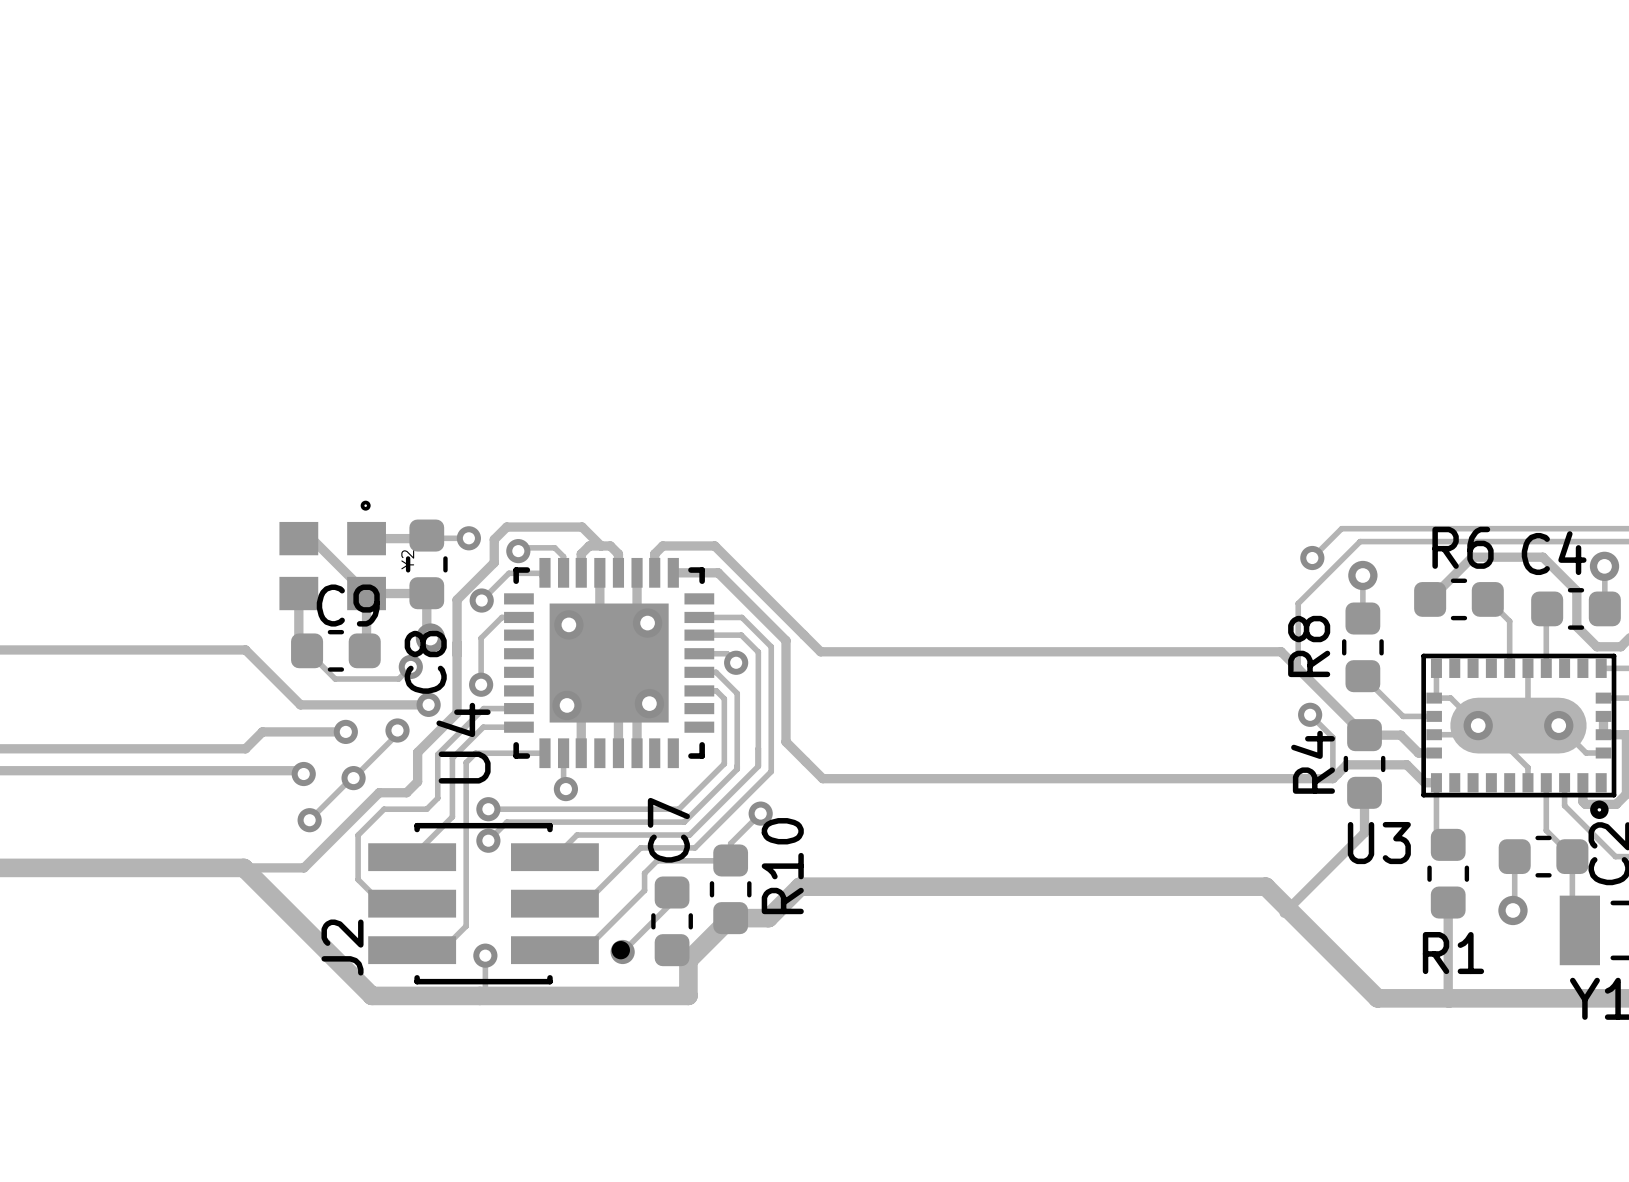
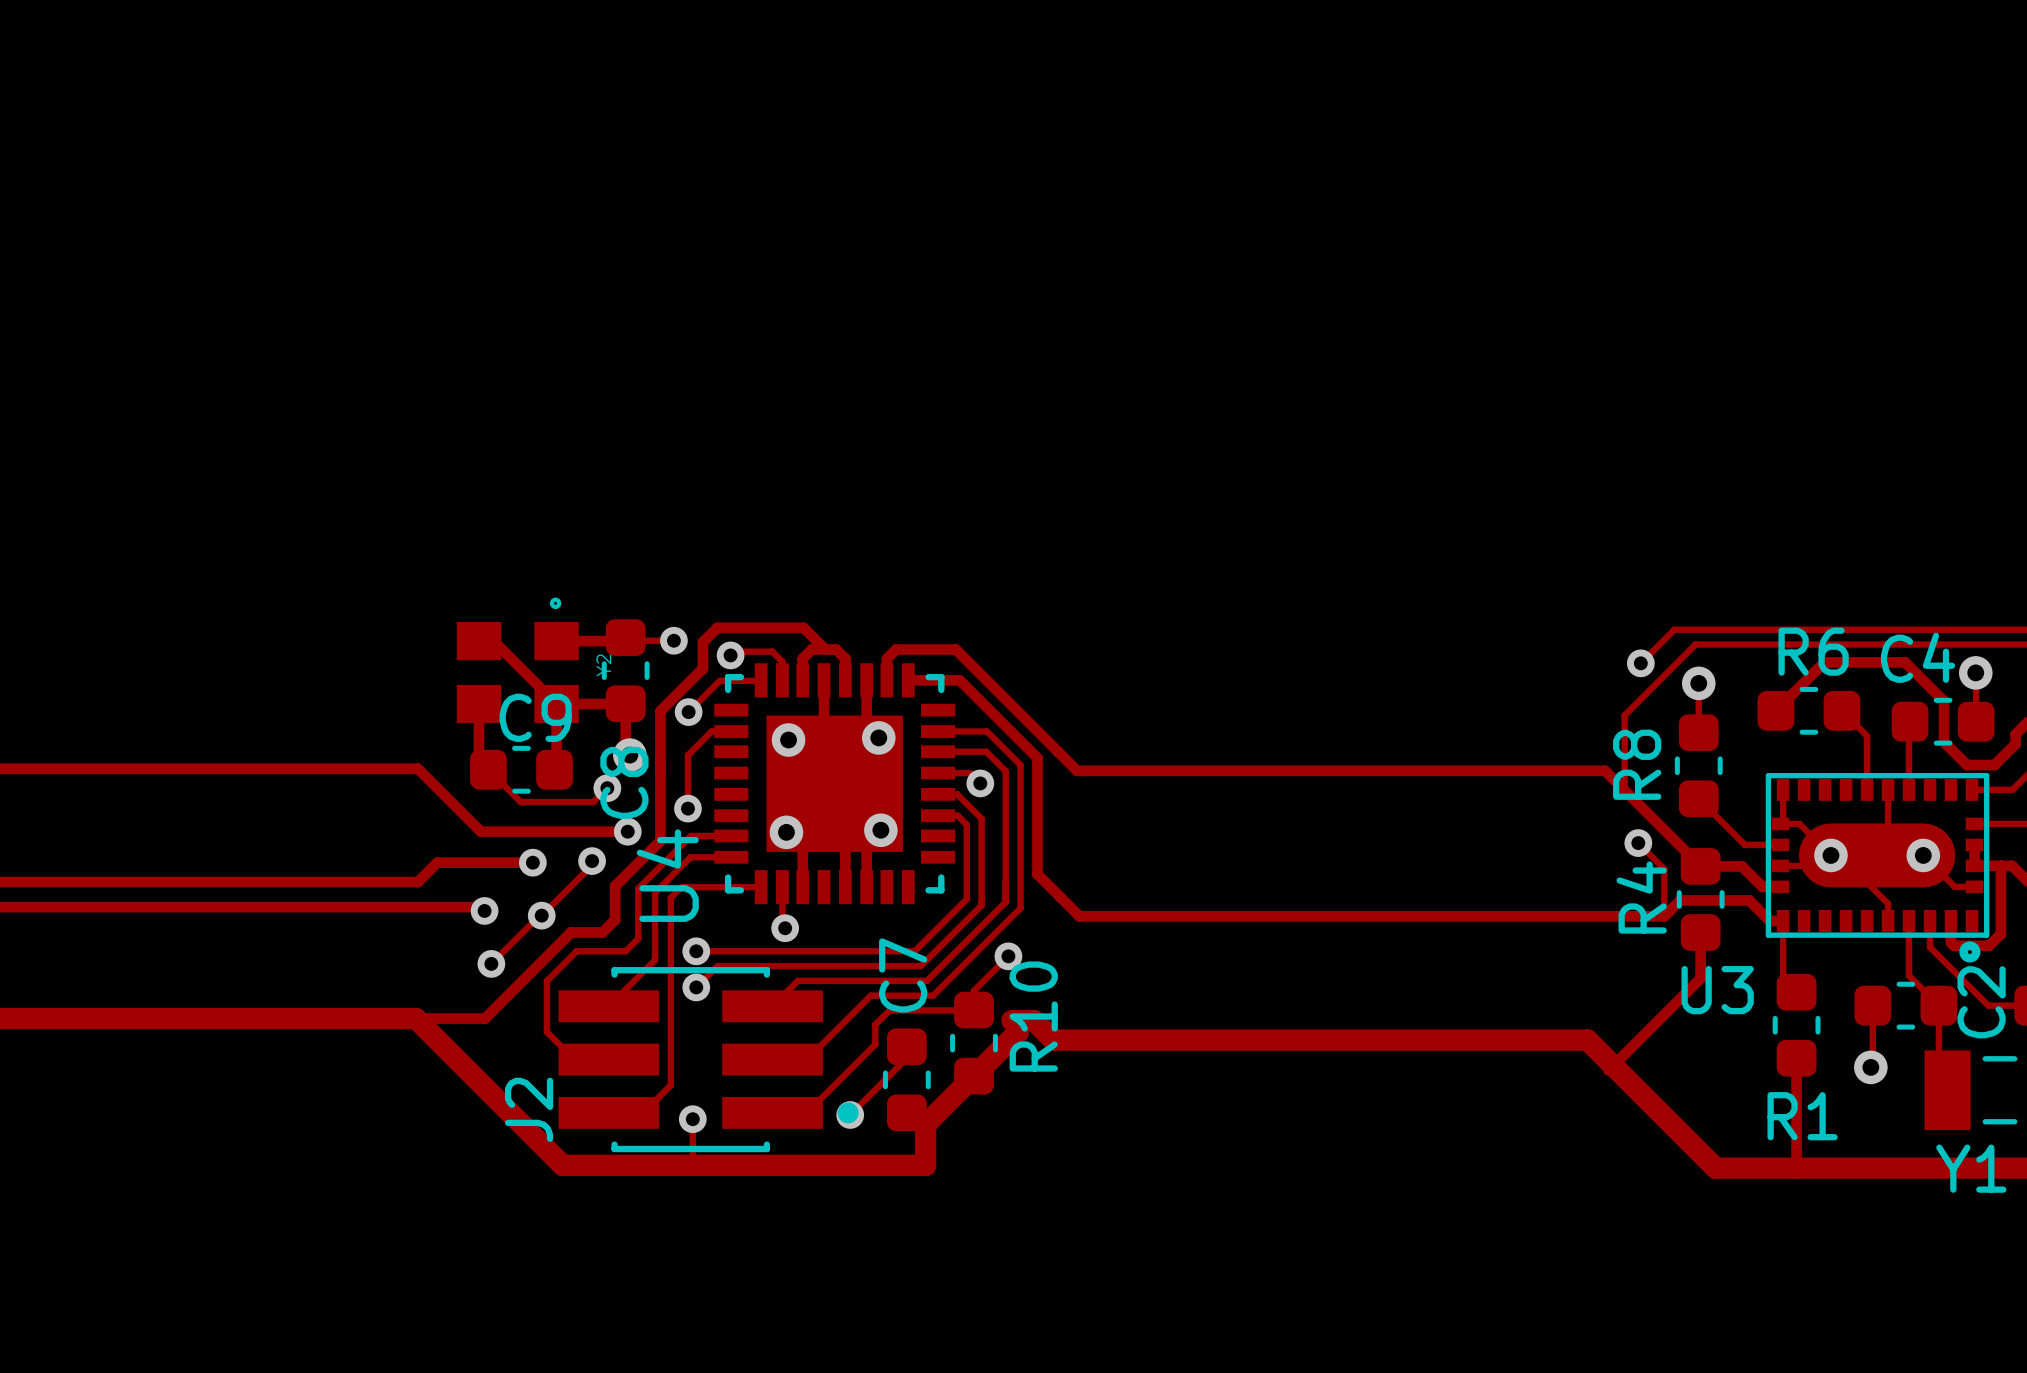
track: none -> (1011, 1020) (1033, 1020) (1053, 1040)
track: (800, 886) (768, 918) (730, 918) -> (1018, 1020) (1018, 1032) (974, 1076)

